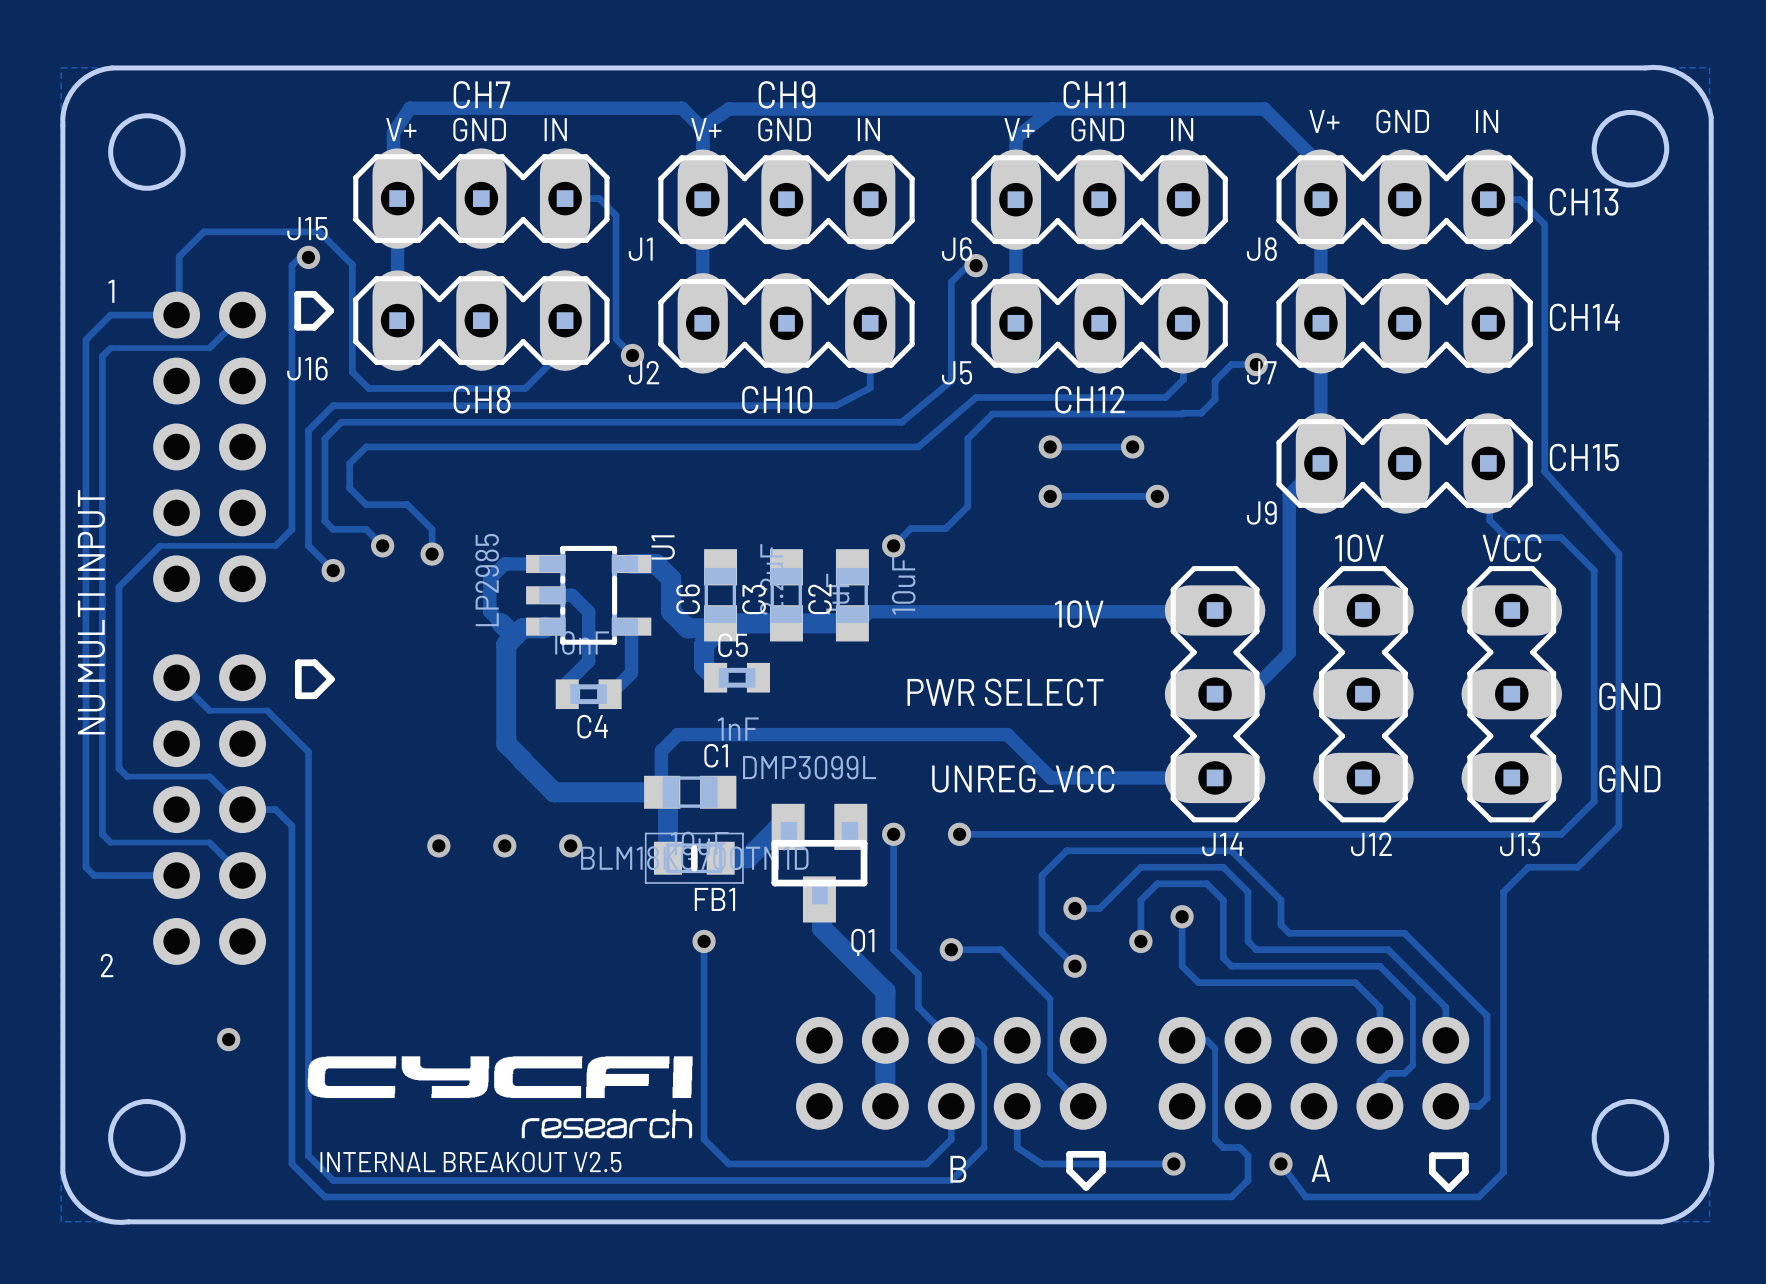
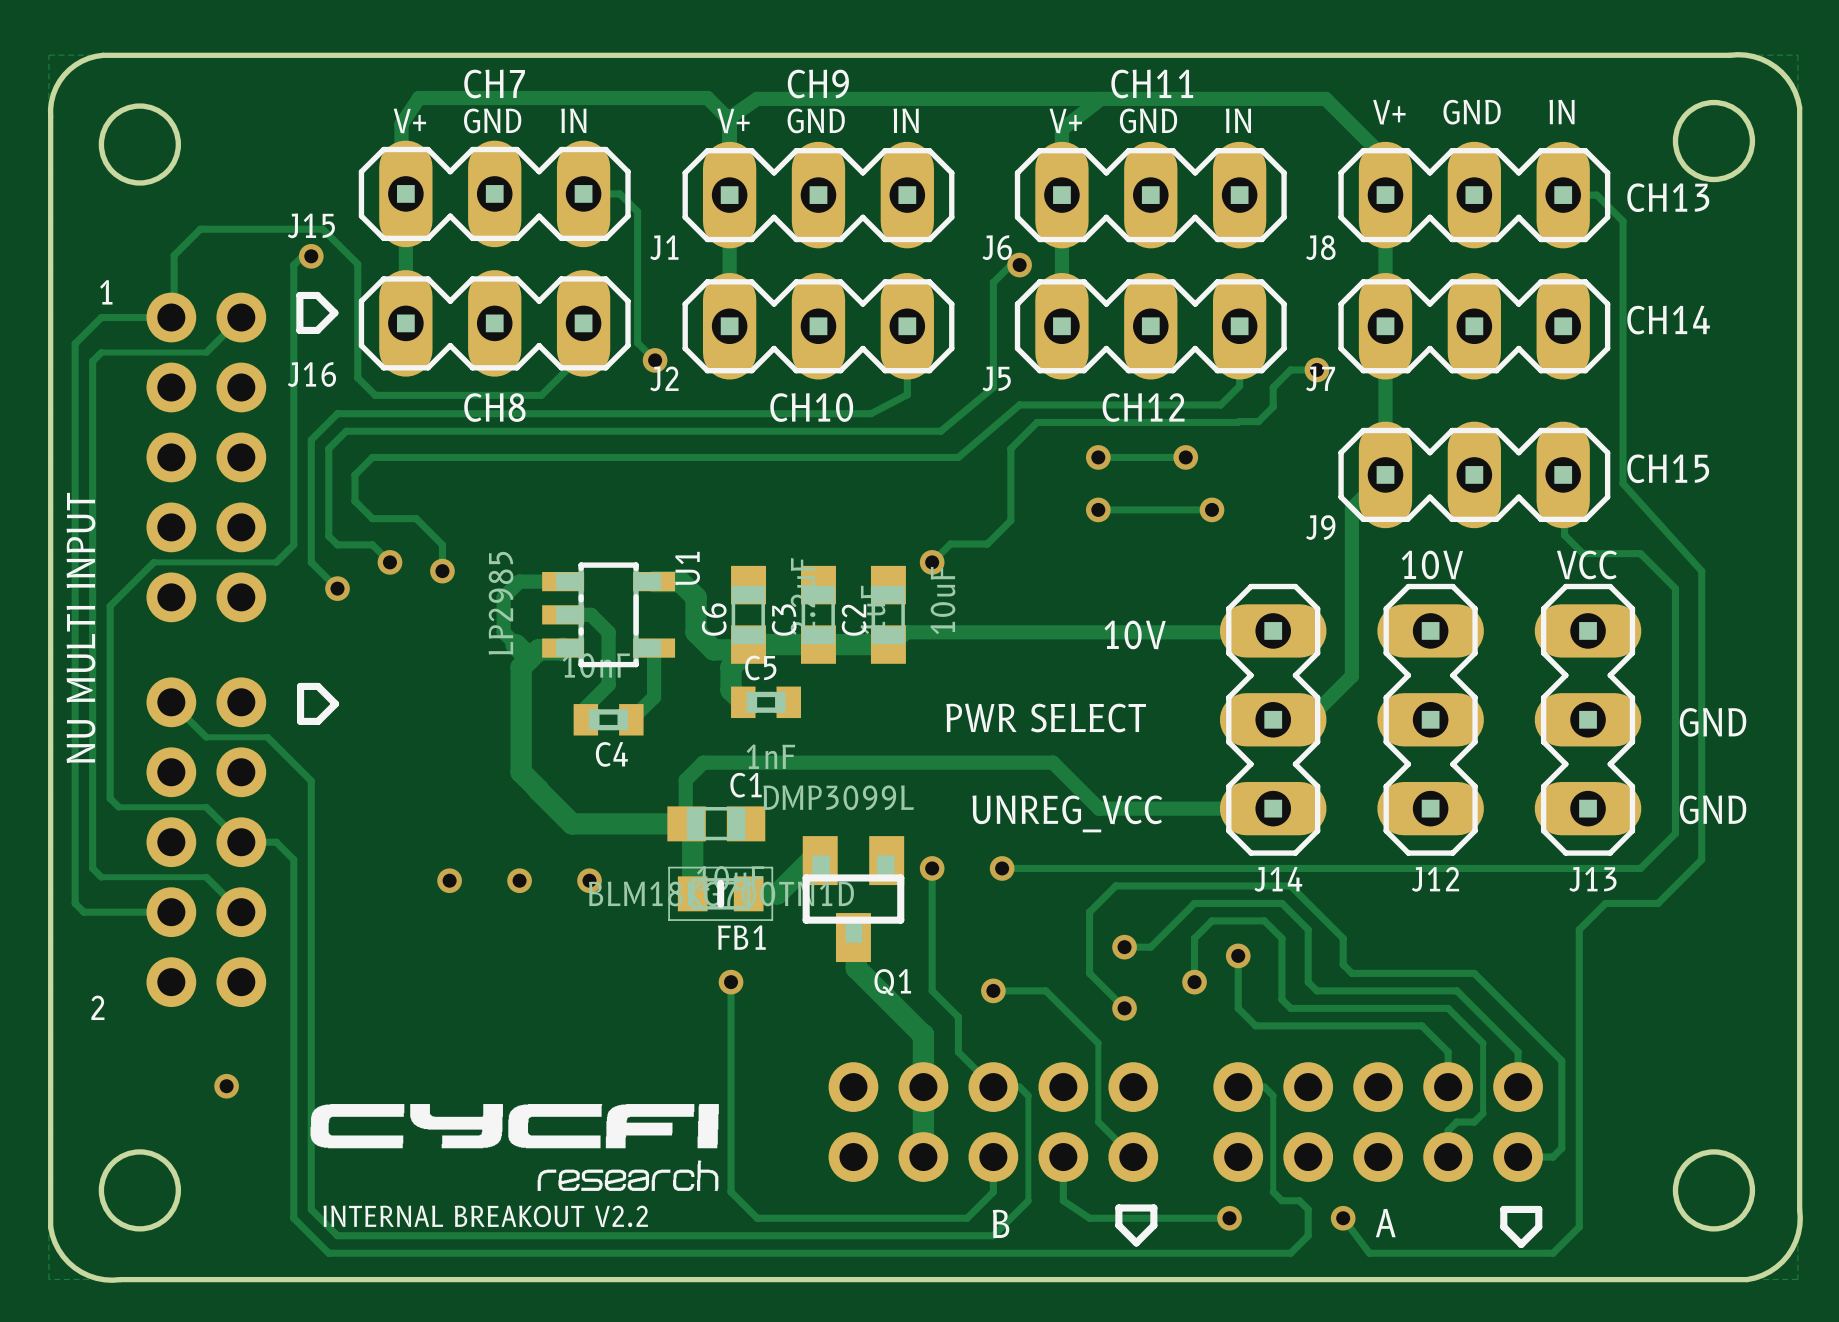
text: INTERNAL BREAKOUT V2.5 (470, 1162) -> INTERNAL BREAKOUT V2.2 (485, 1216)

